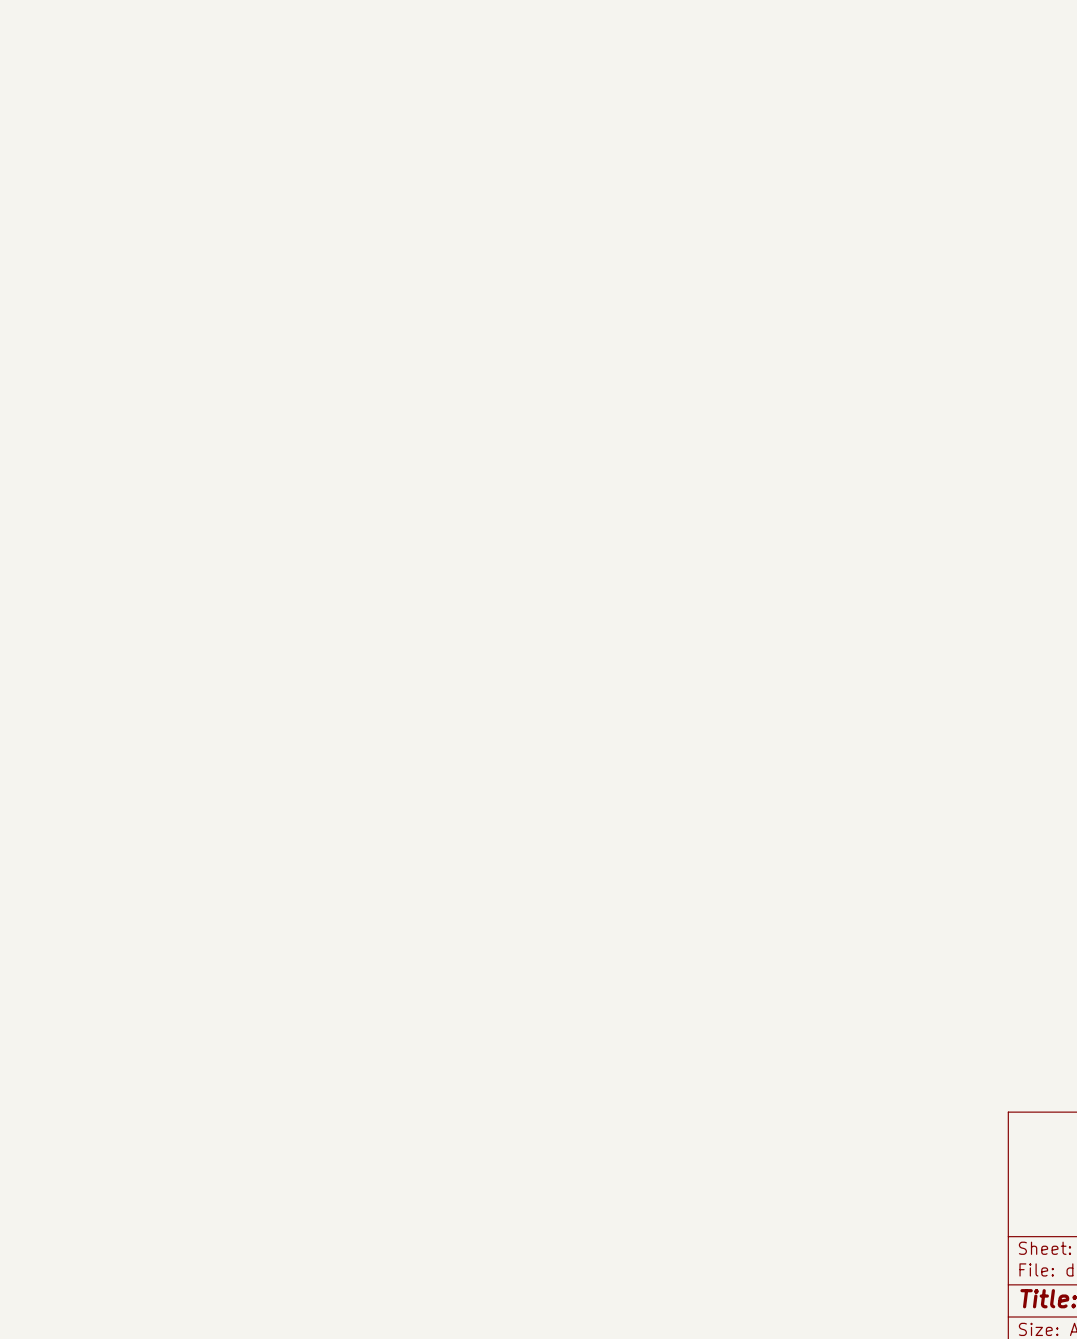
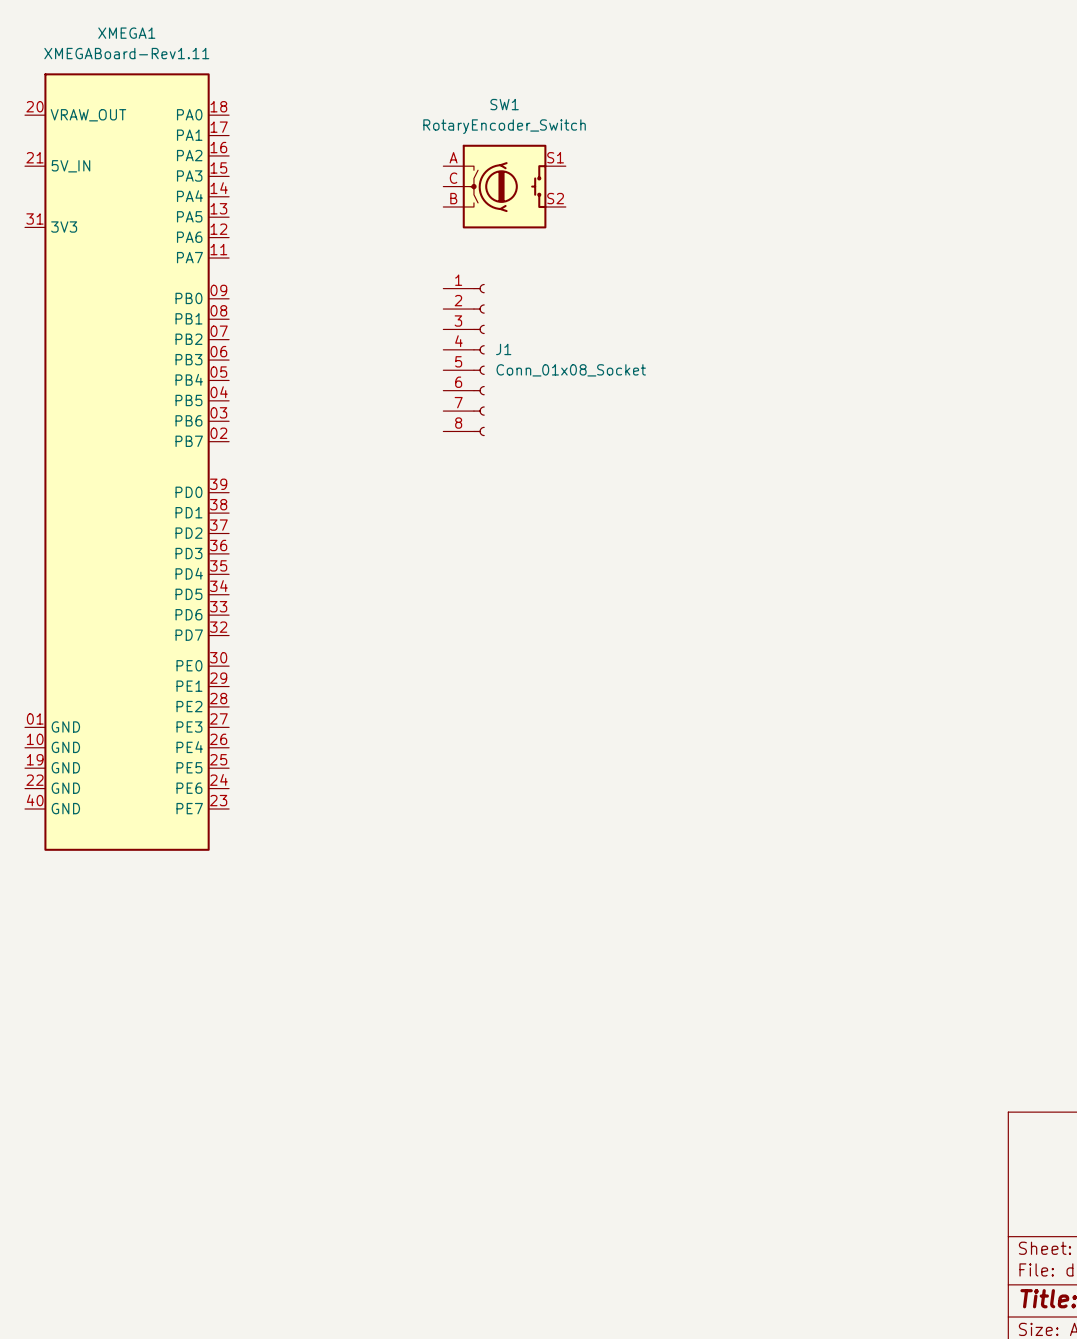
SW1: none -> RotaryEncoder_Switch (504, 186)
J1: none -> Conn_01x08_Socket (464, 360)
XMEGA1: none -> XMEGABoard-Rev1.11 (127, 462)

